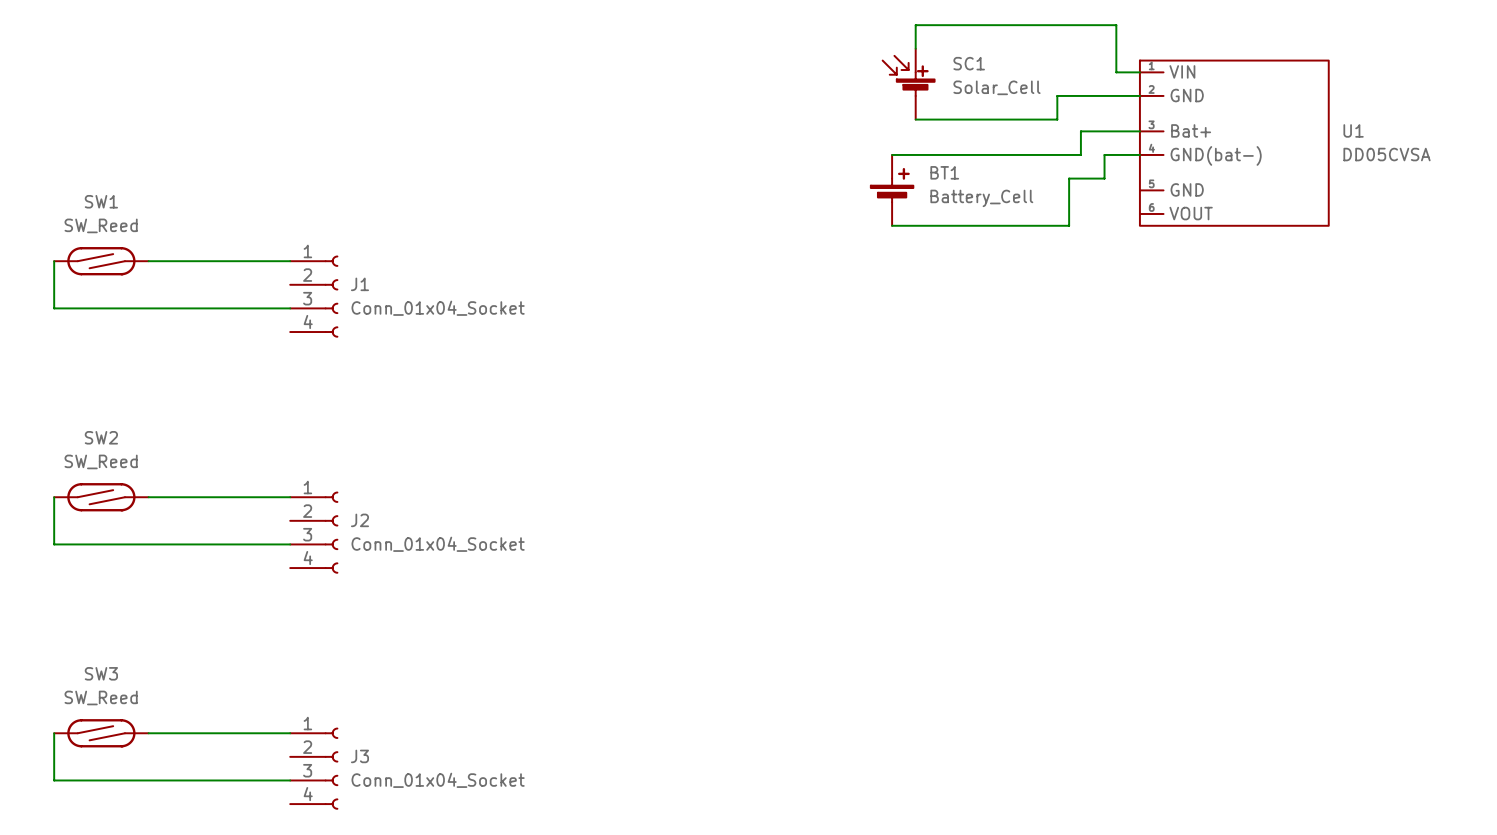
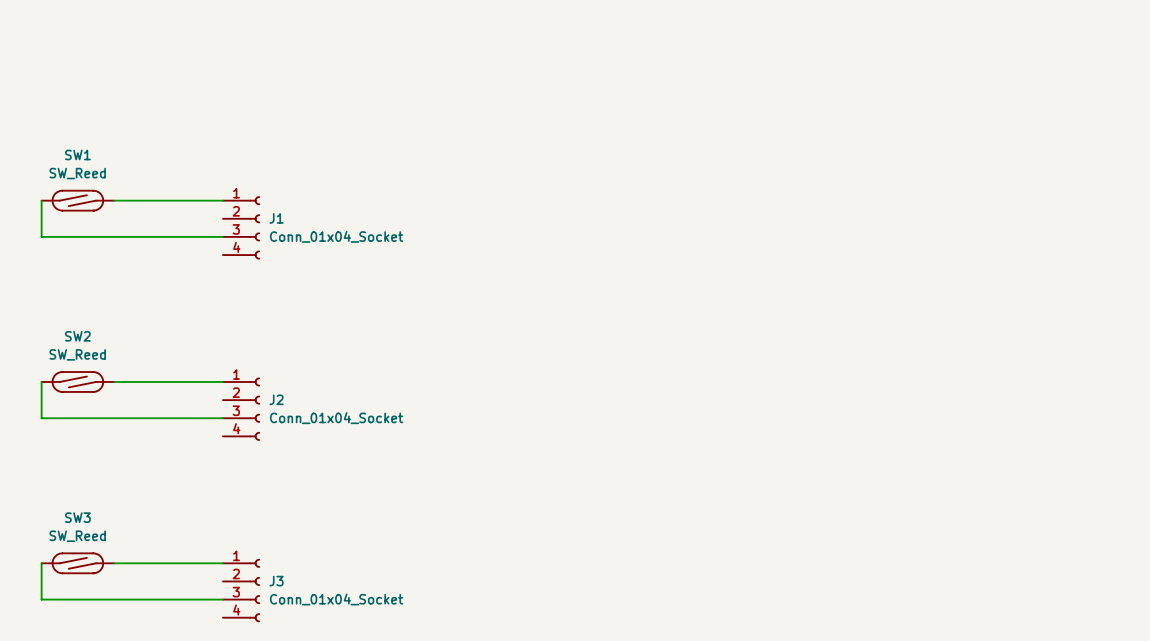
wire: (915, 48) (915, 25) (1116, 25) (1116, 72) (1139, 72) -> none
SC1: Solar_Cell (908, 84) -> none
wire: (1139, 95) (1057, 95) (1057, 119) (915, 119) -> none
wire: (1139, 131) (1080, 131) (1080, 154) (892, 154) -> none
U1: DD05CVSA (1234, 143) -> none
wire: (1139, 154) (1104, 154) (1104, 178) (1069, 178) (1069, 225) (892, 225) -> none
BT1: Battery_Cell (892, 190) -> none

